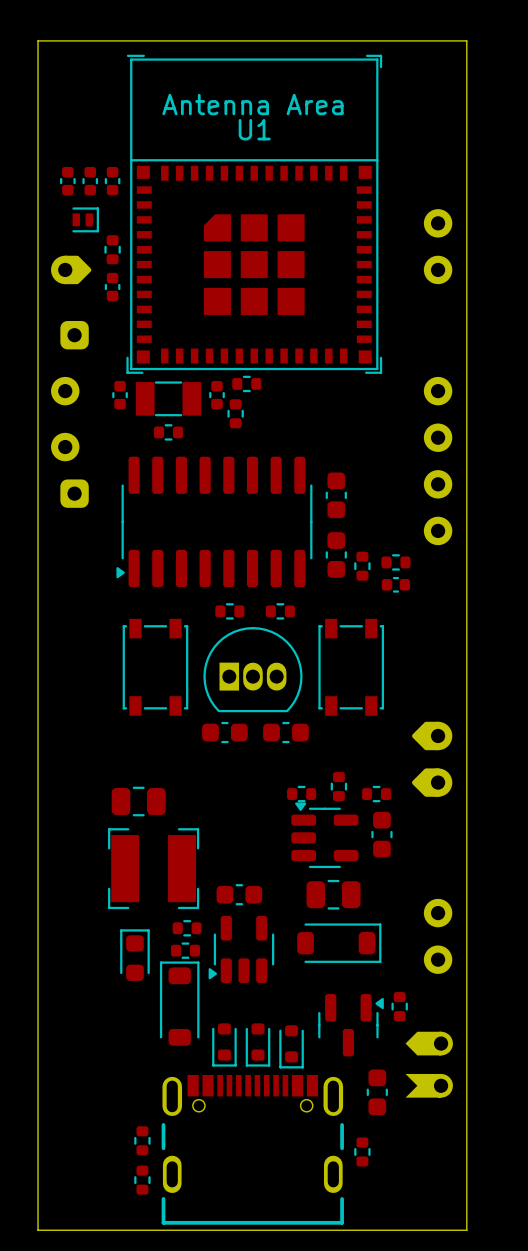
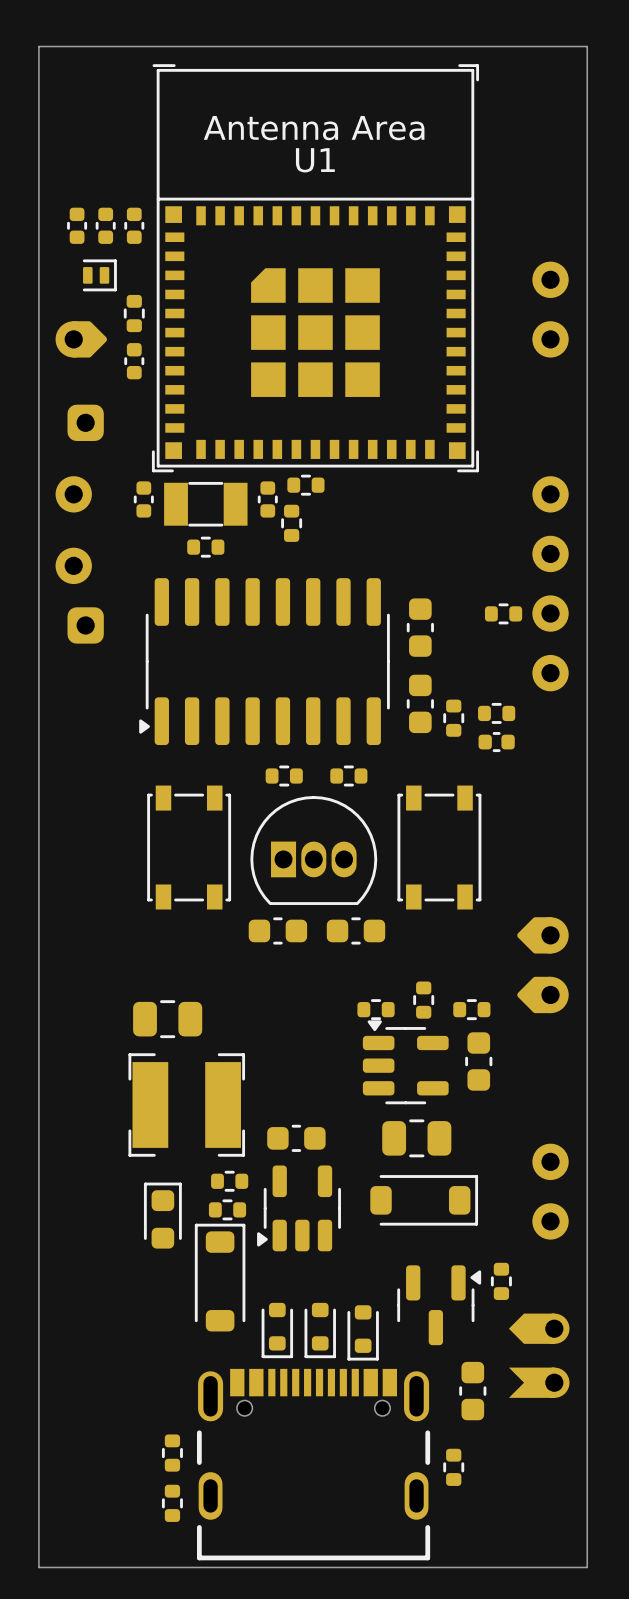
part: none -> (503, 613)

